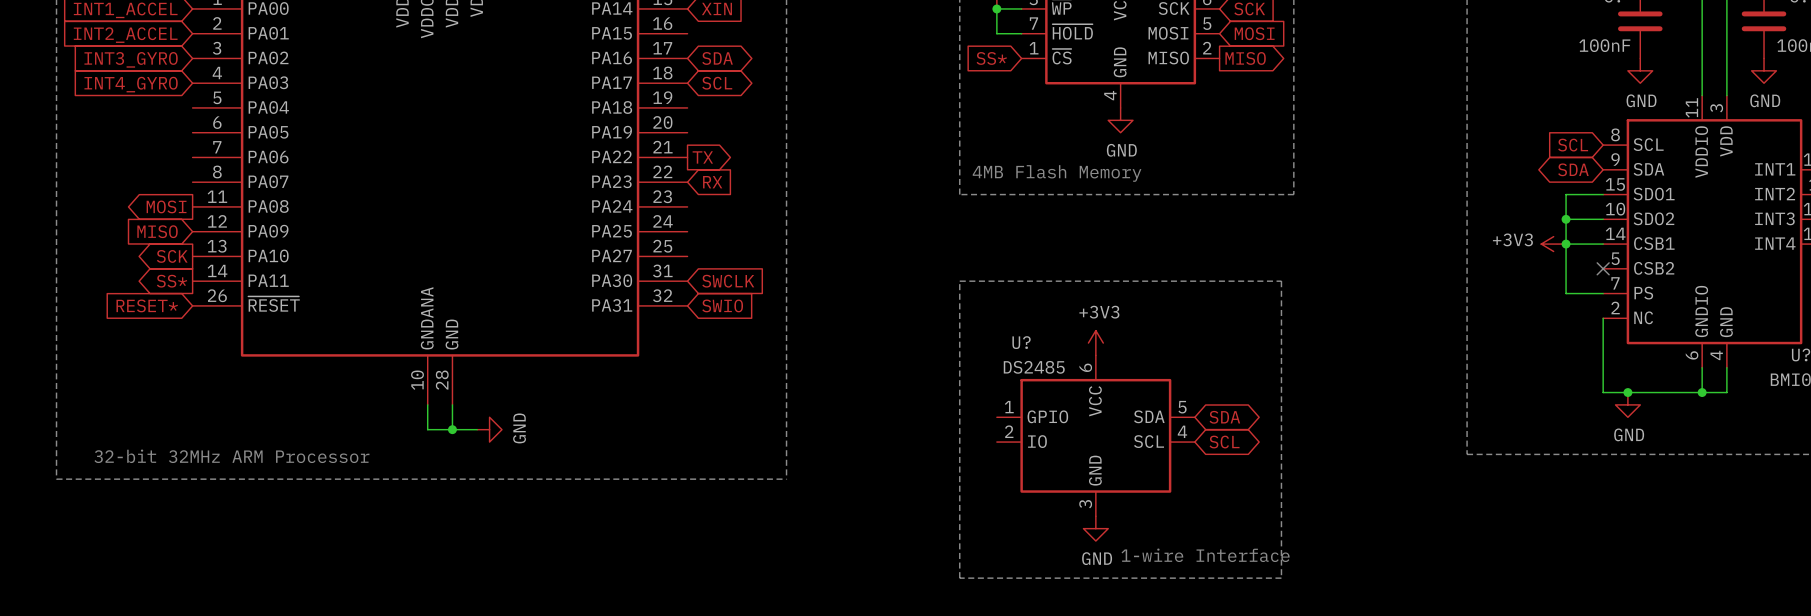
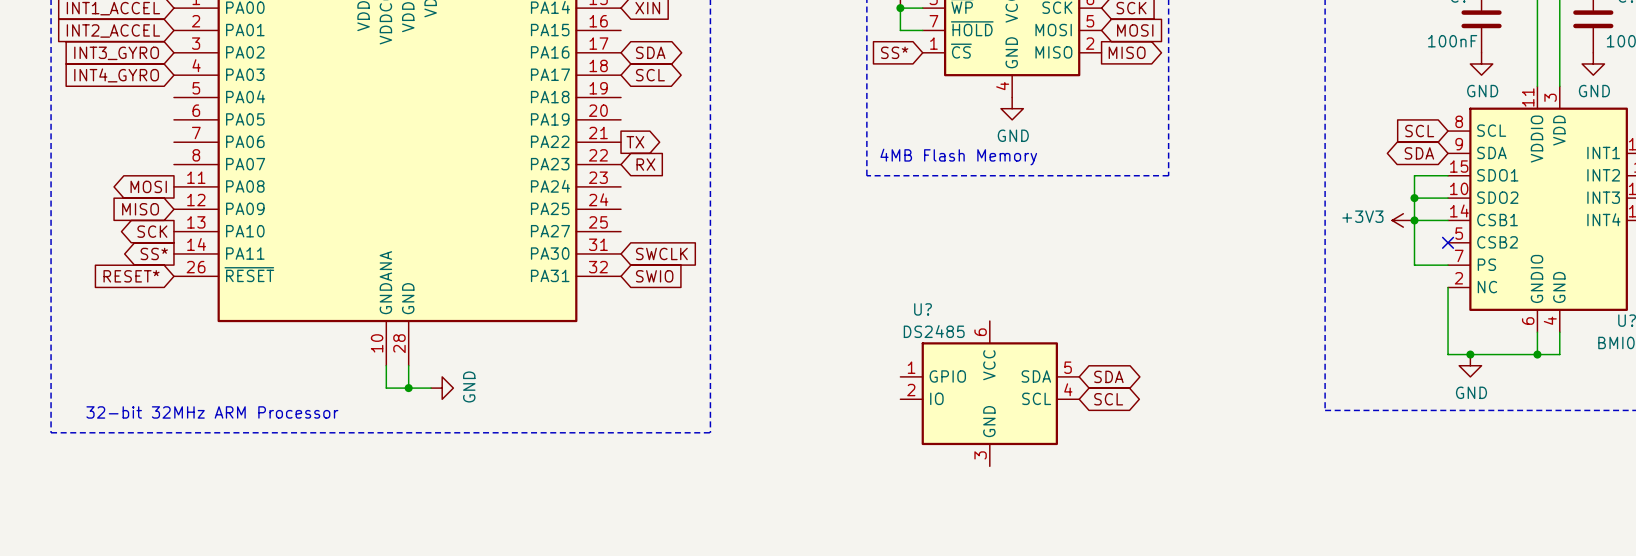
line: (959, 281) (1281, 281) (1281, 578) (959, 578) (959, 281) -> none
power symbol: +3V3 (1095, 343) -> none
power symbol: GND (1095, 528) -> none
text: 1-wire Interface (1205, 555) -> none

